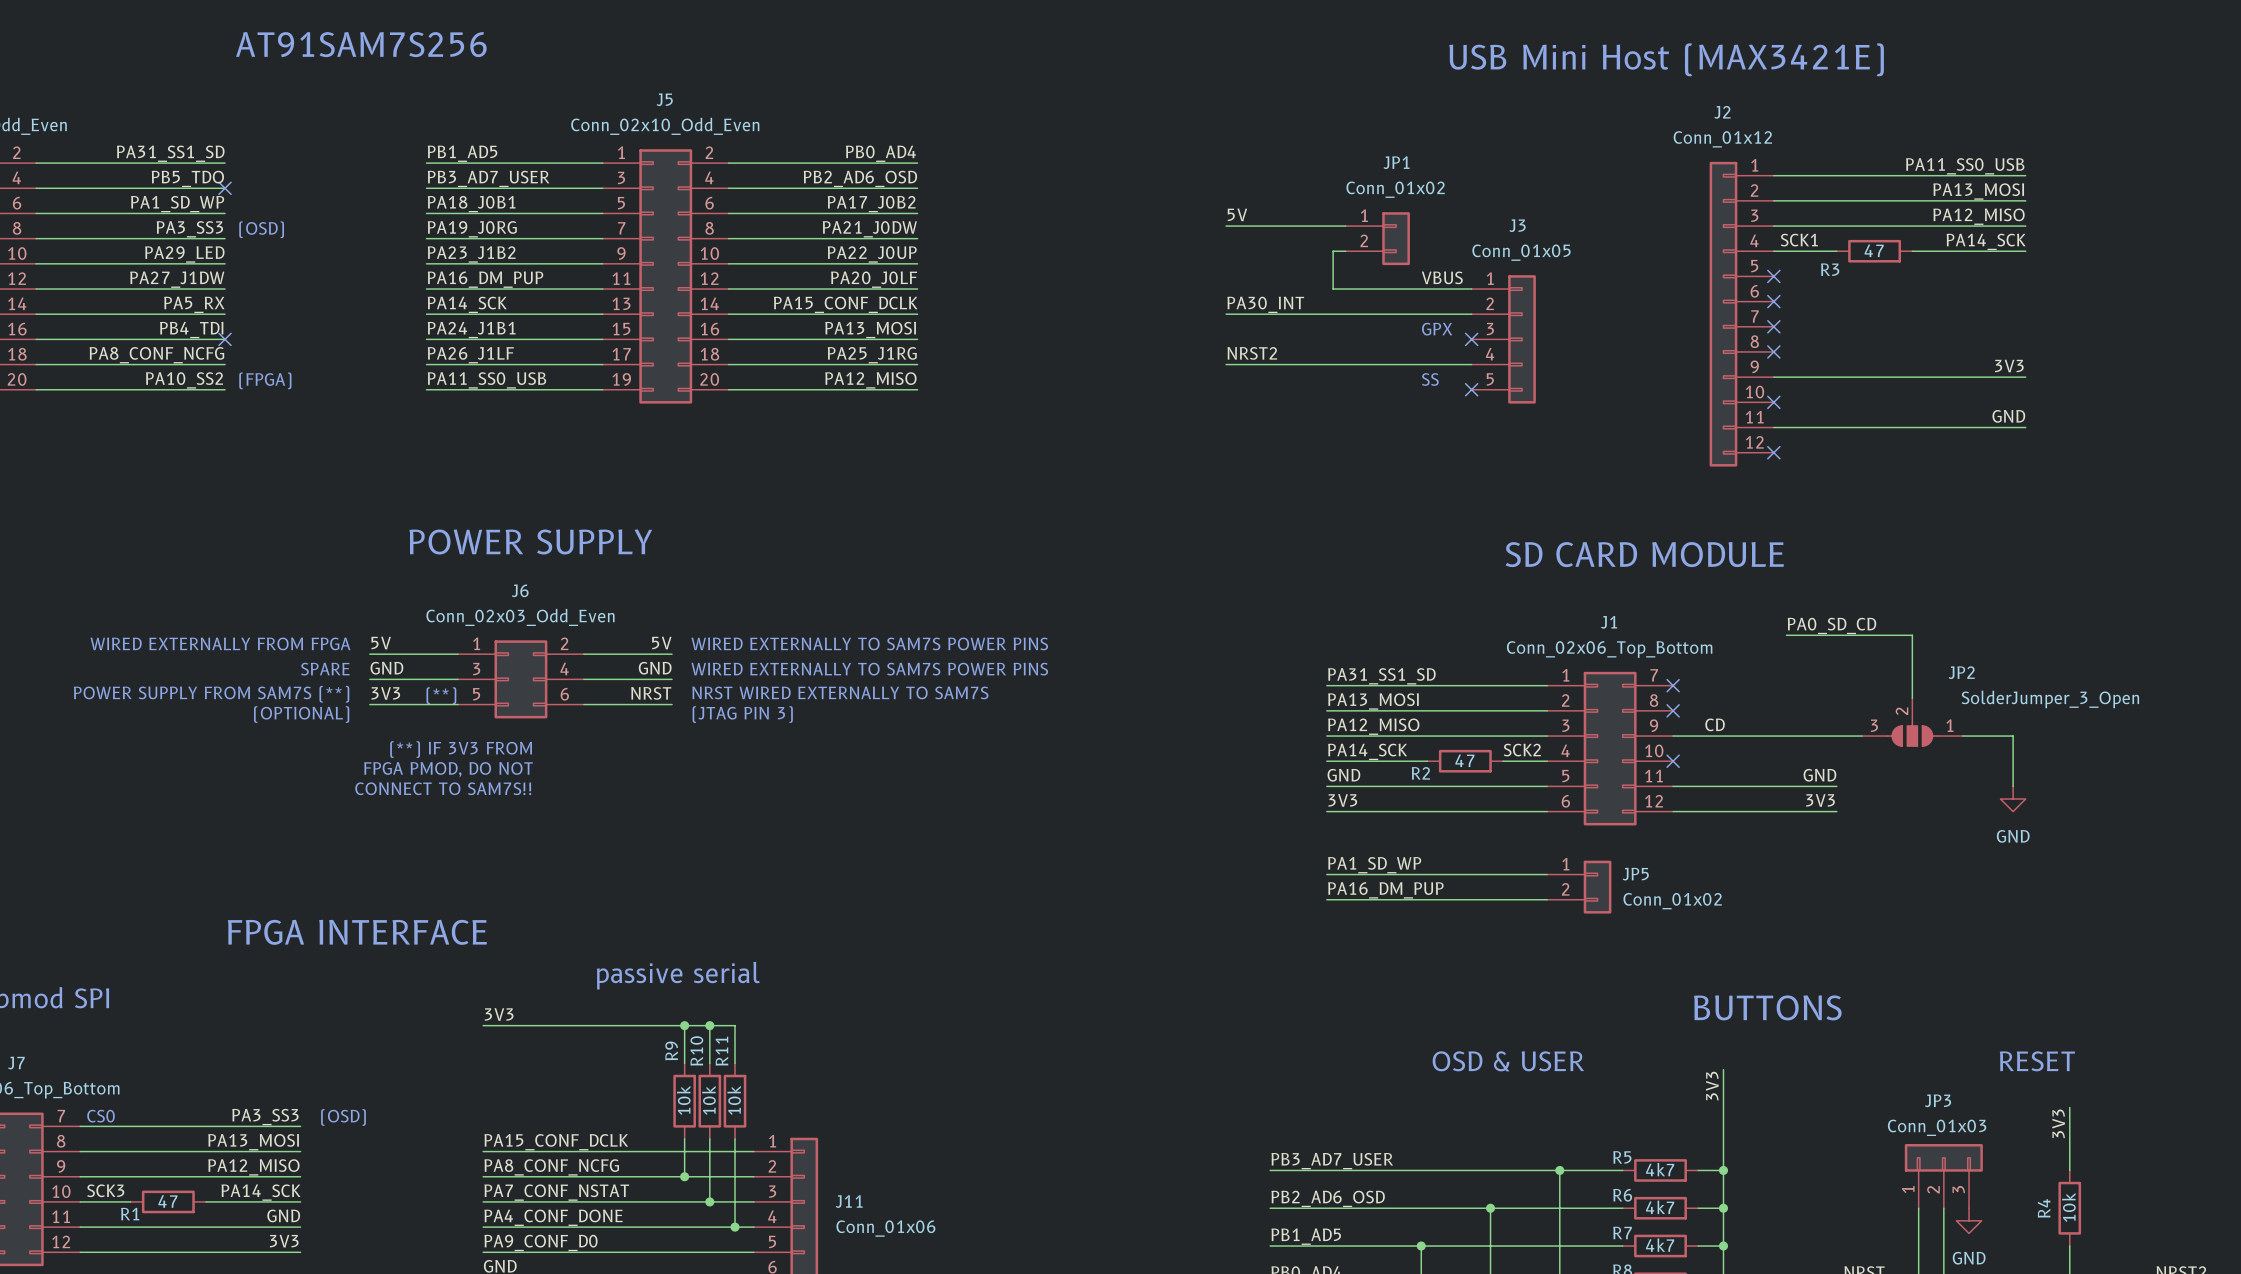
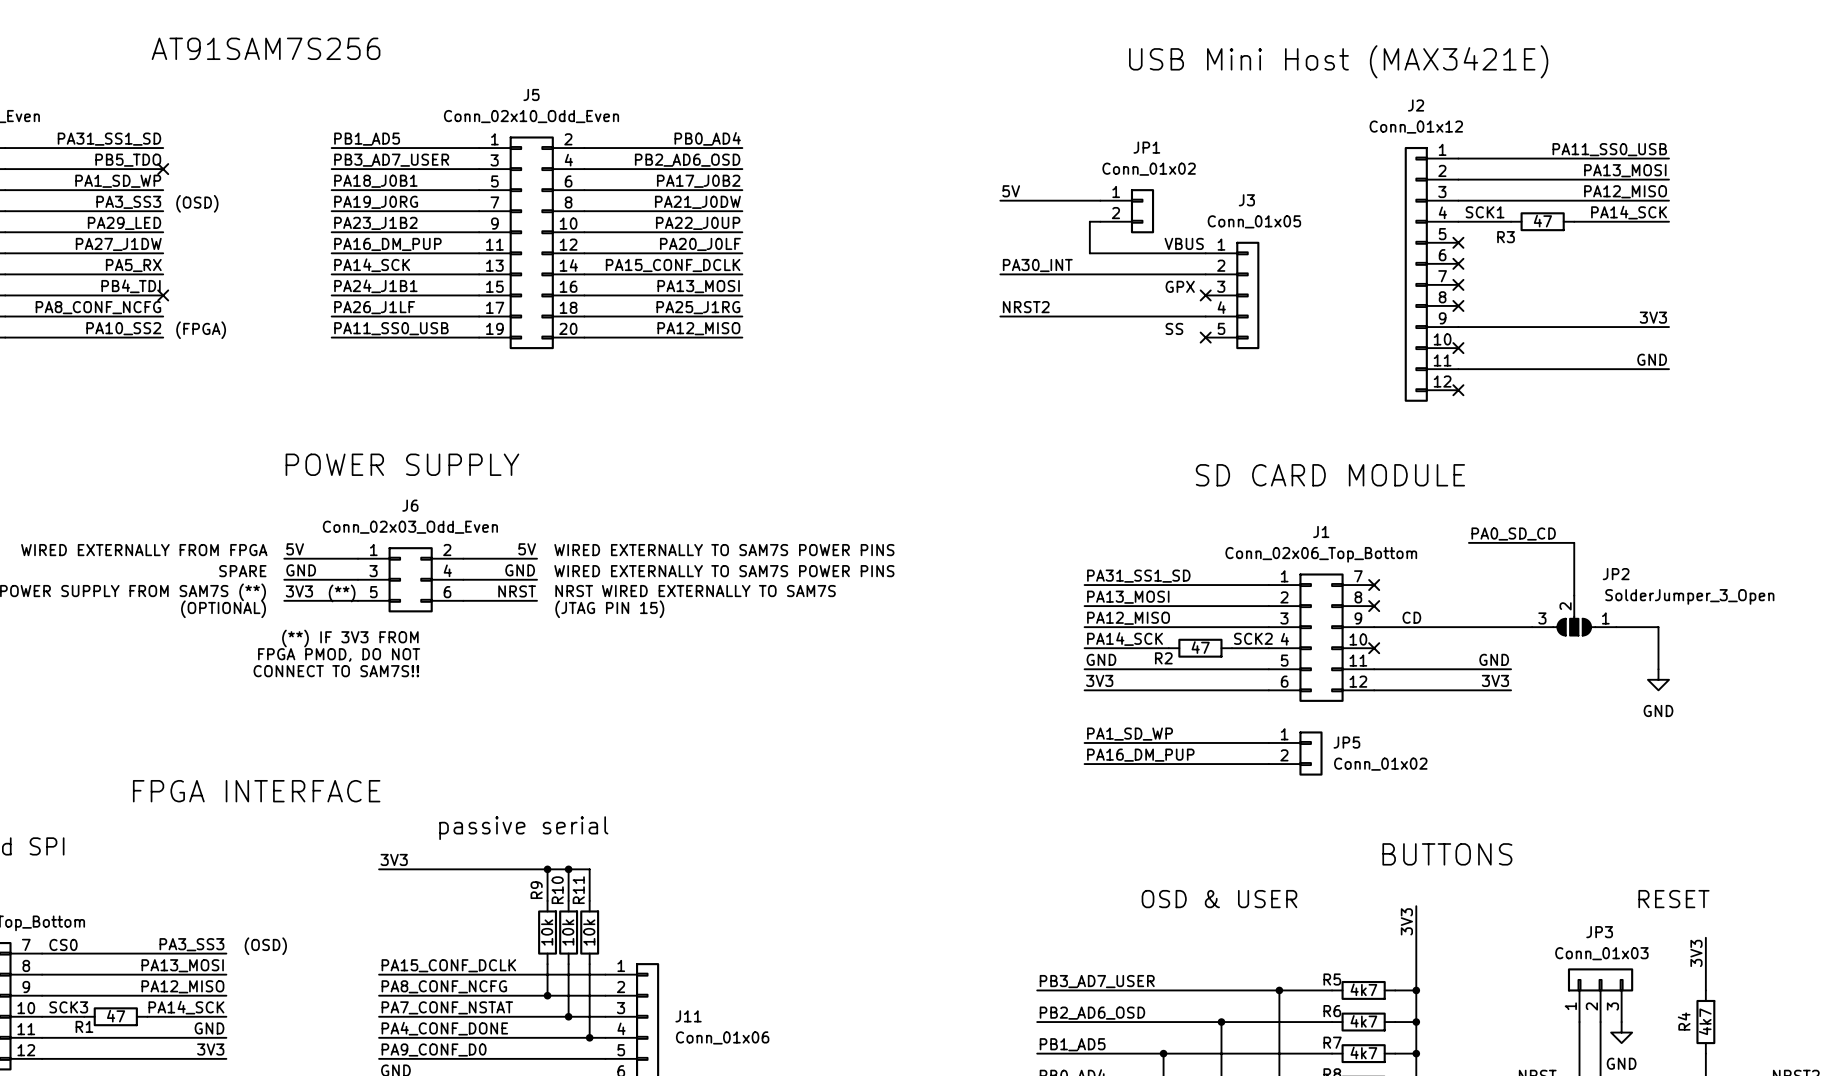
text: (JTAG PIN 3) (742, 714) -> (JTAG PIN 15) (609, 609)
R4 value: 10k (2068, 1207) -> 4k7 (1705, 1021)

